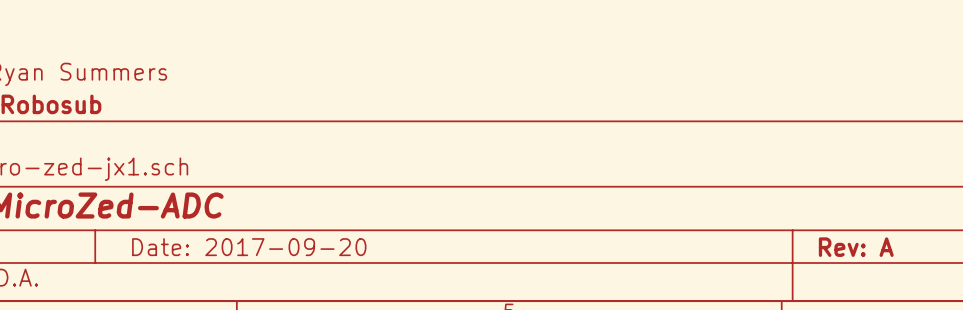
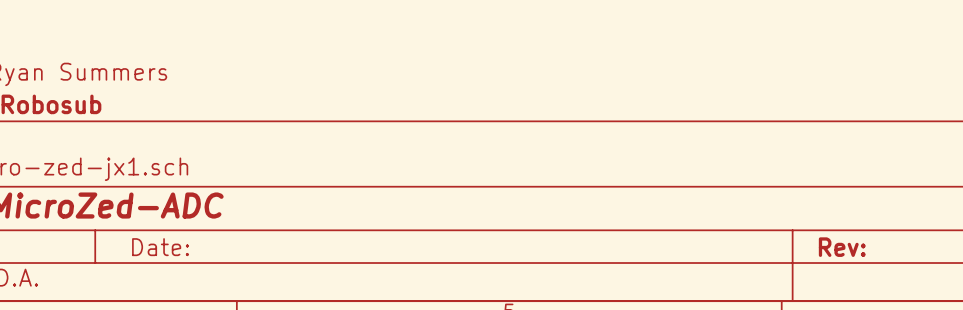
title block: Date: 2017-09-20 (249, 247) -> Date: (160, 247)
title block: Rev: A (856, 247) -> Rev: (842, 247)

